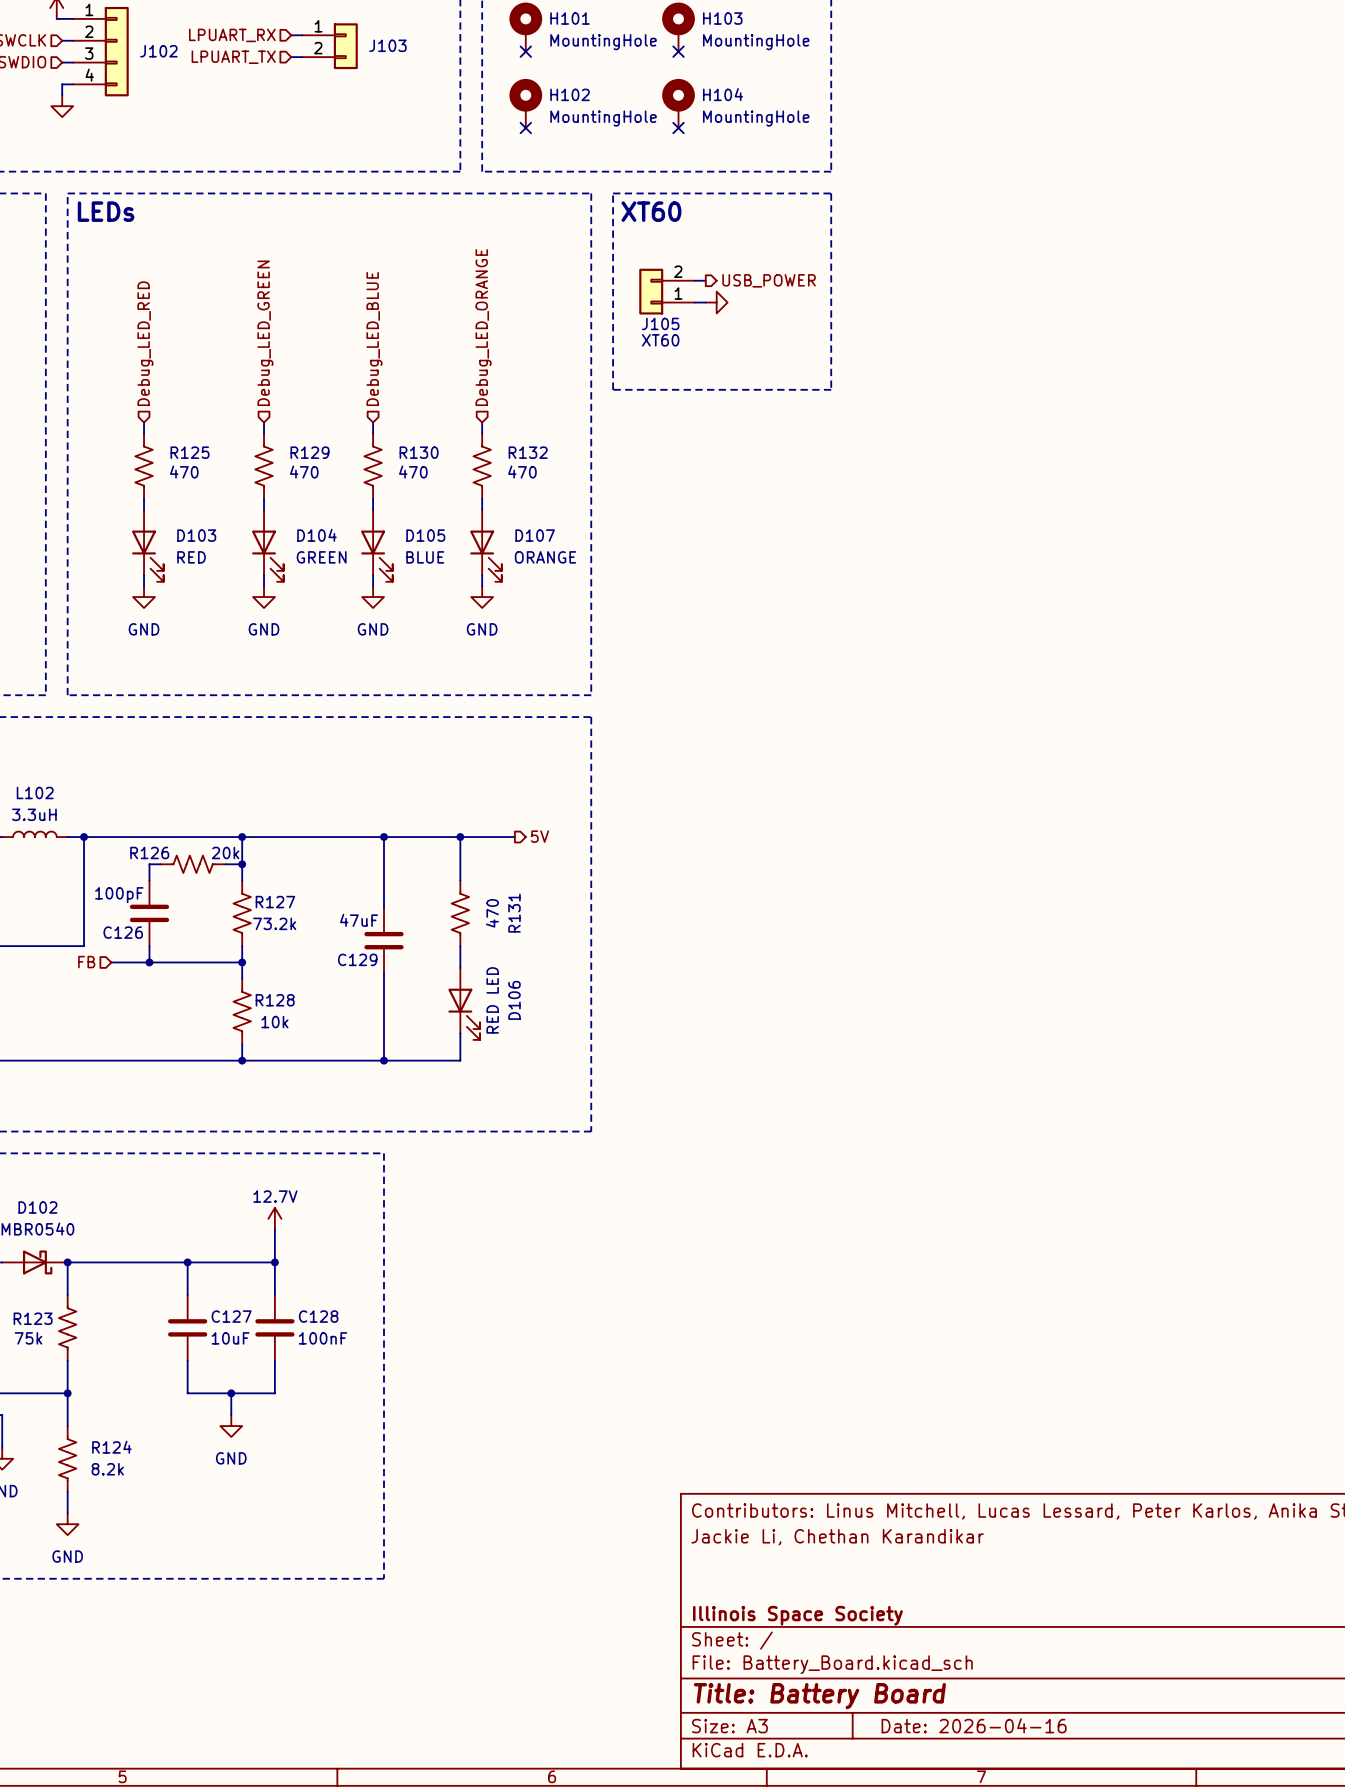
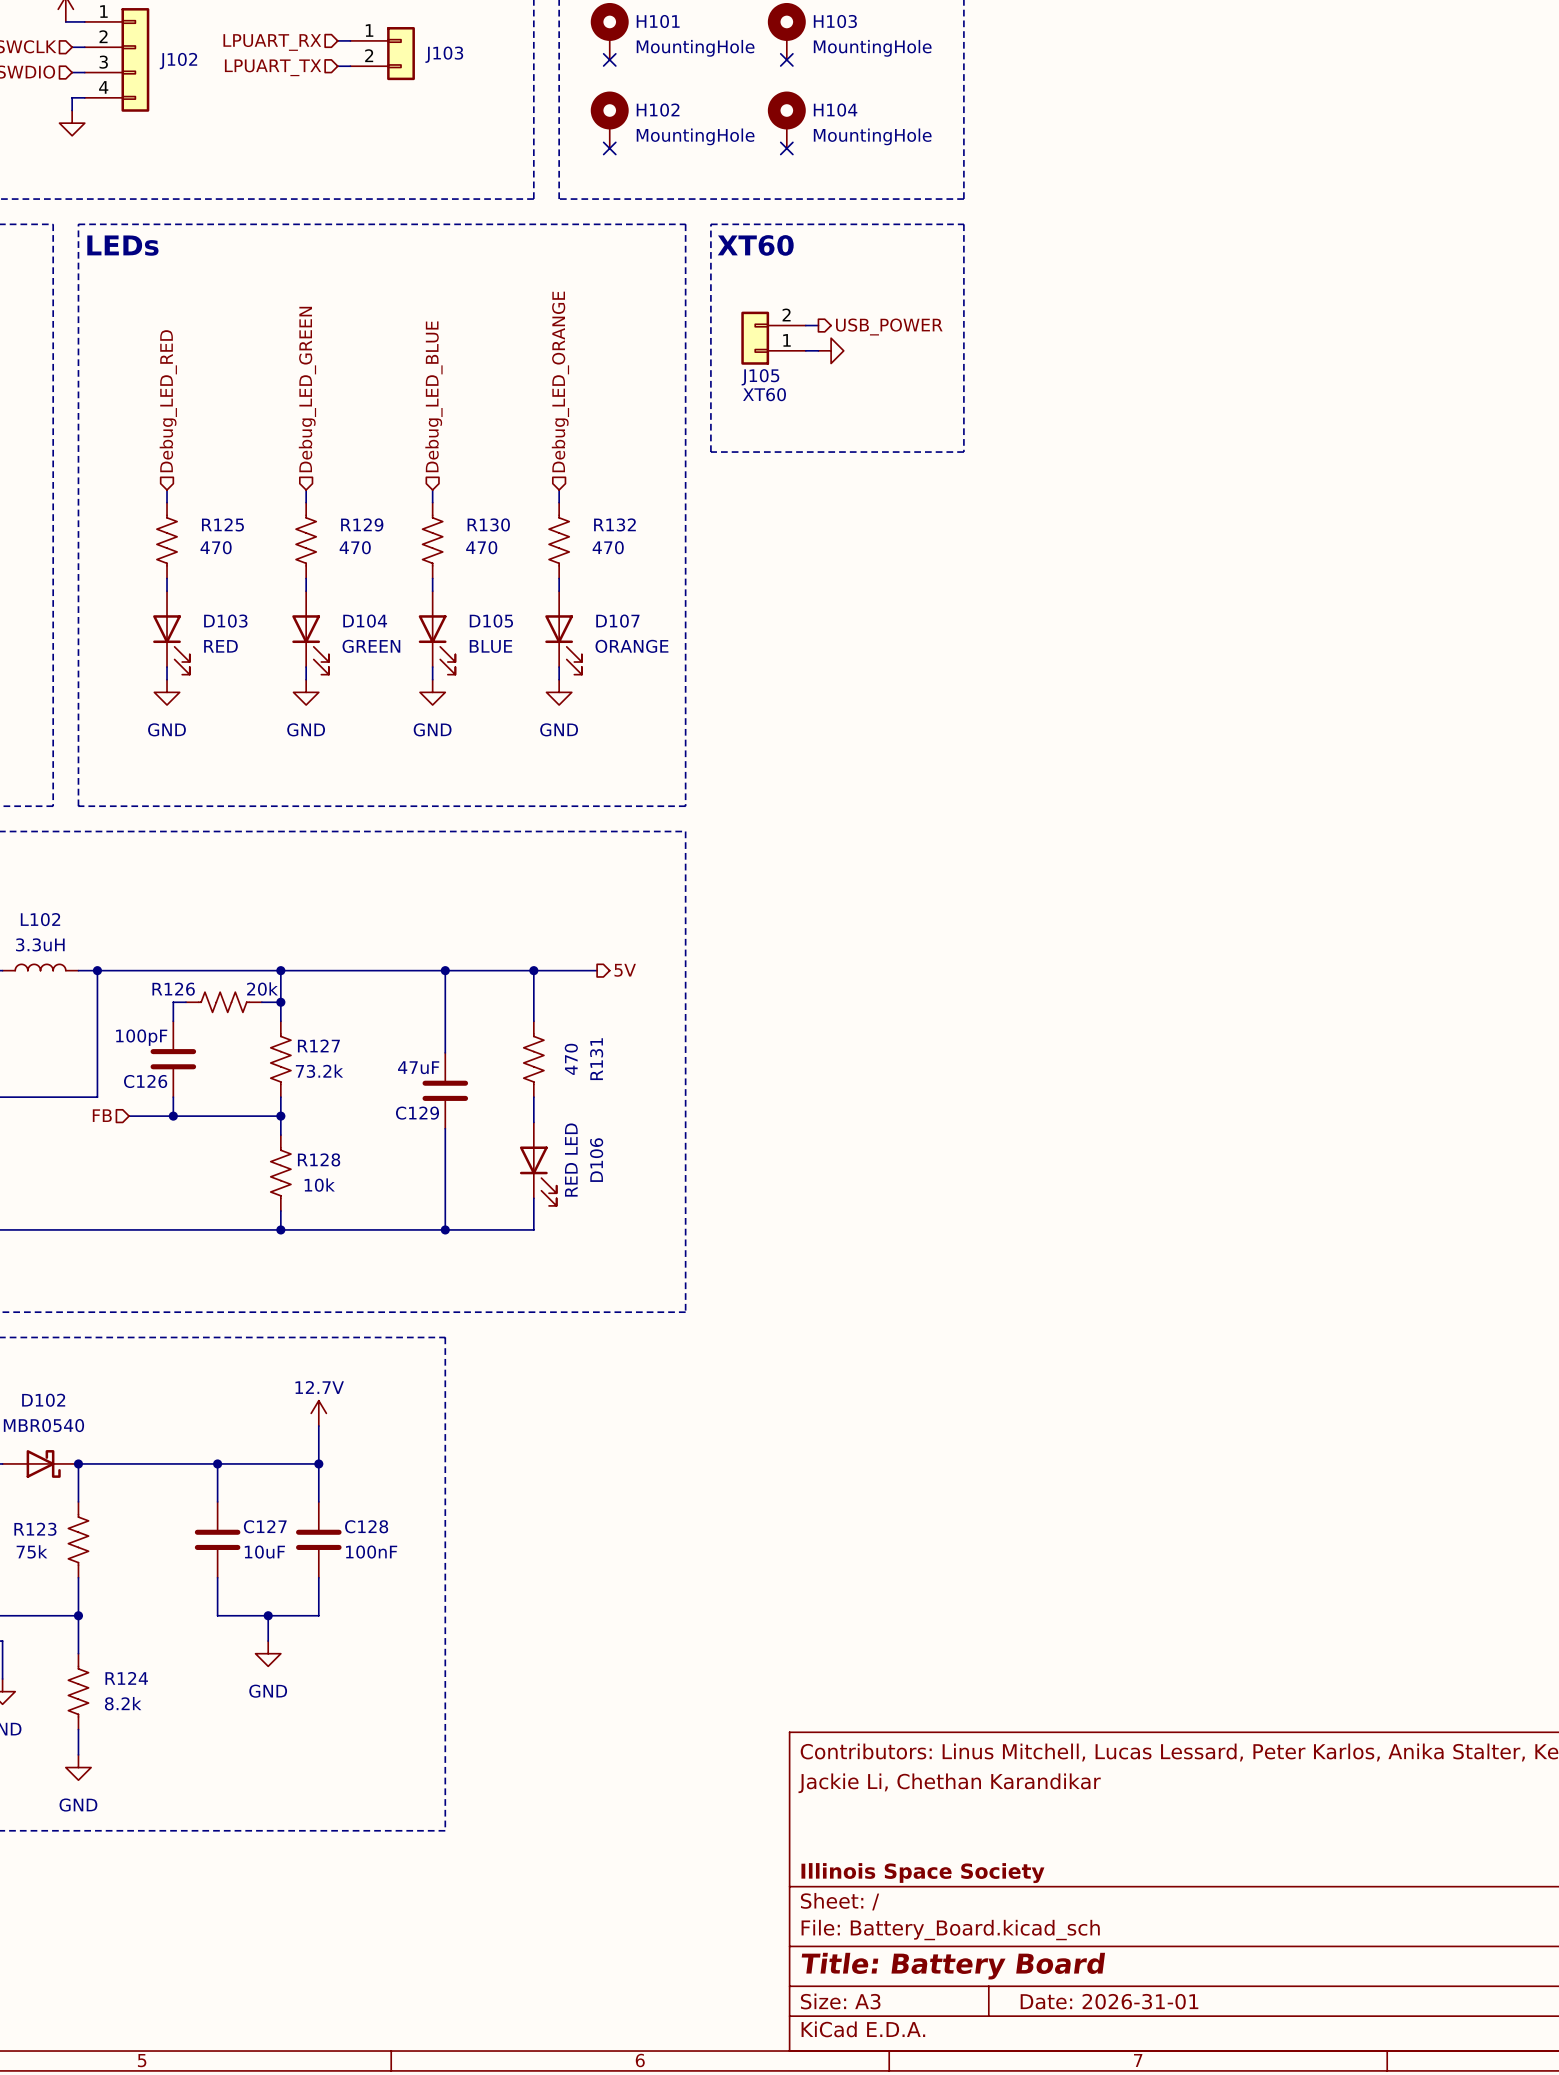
title block: Date: 2026-04-16 (974, 1725) -> Date: 2026-31-01 (1109, 2001)

